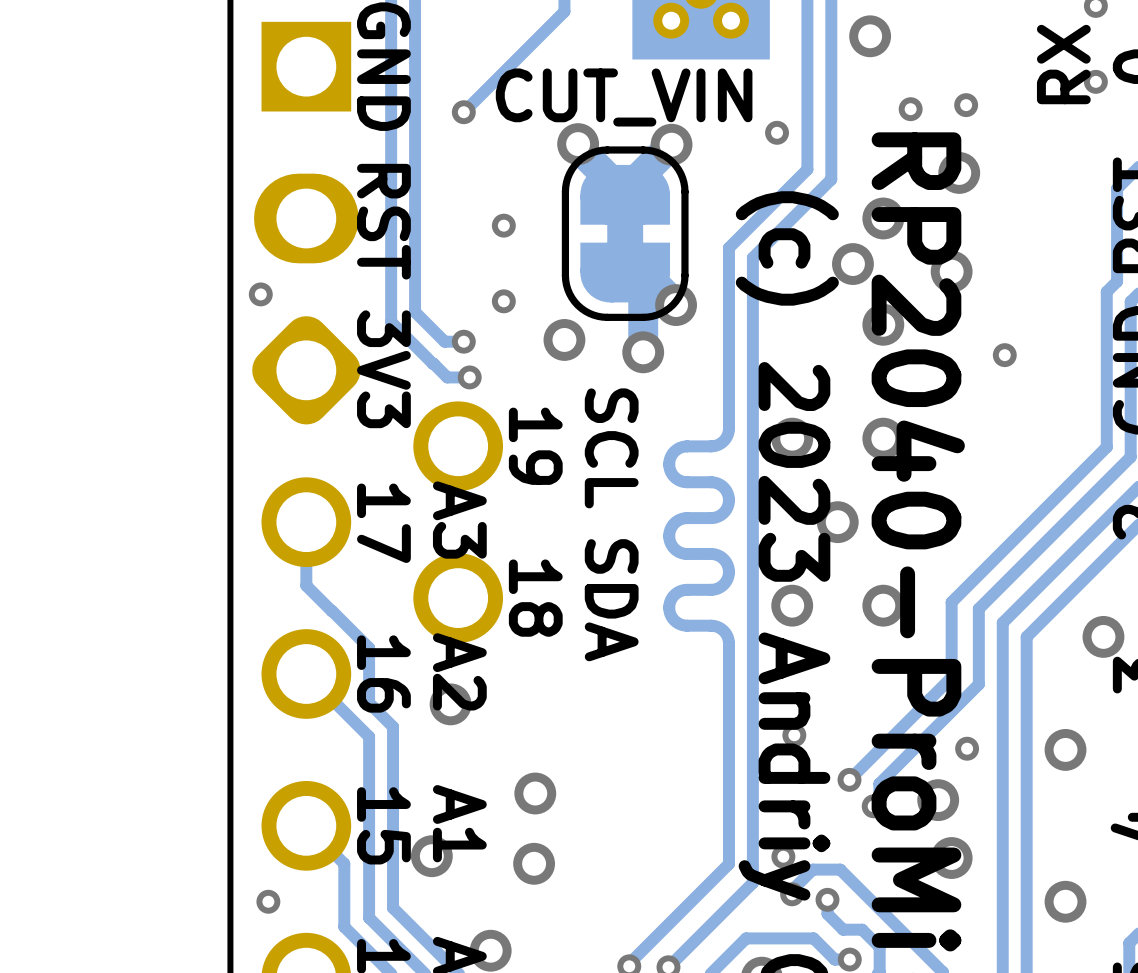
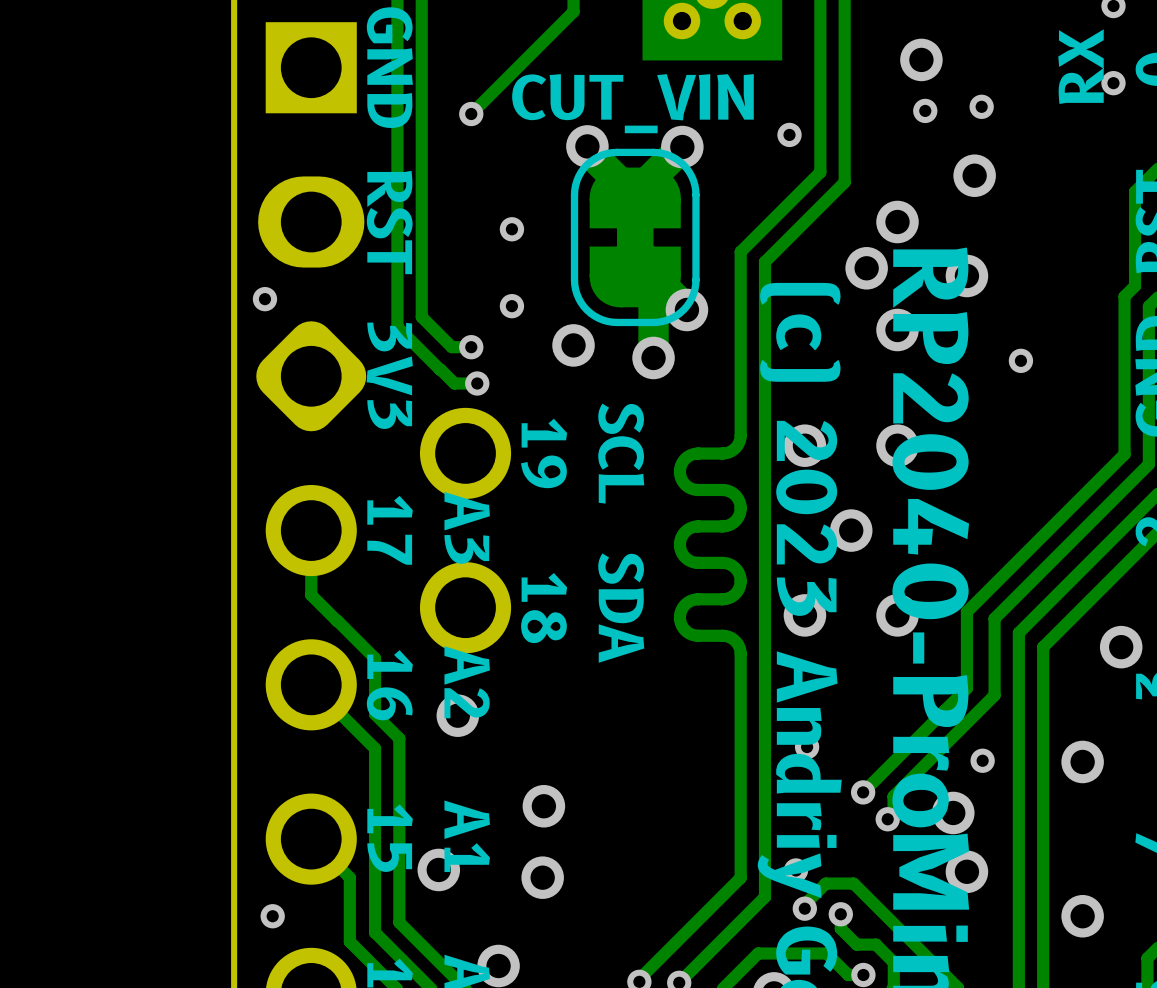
via position: (870, 36) -> (921, 59)

